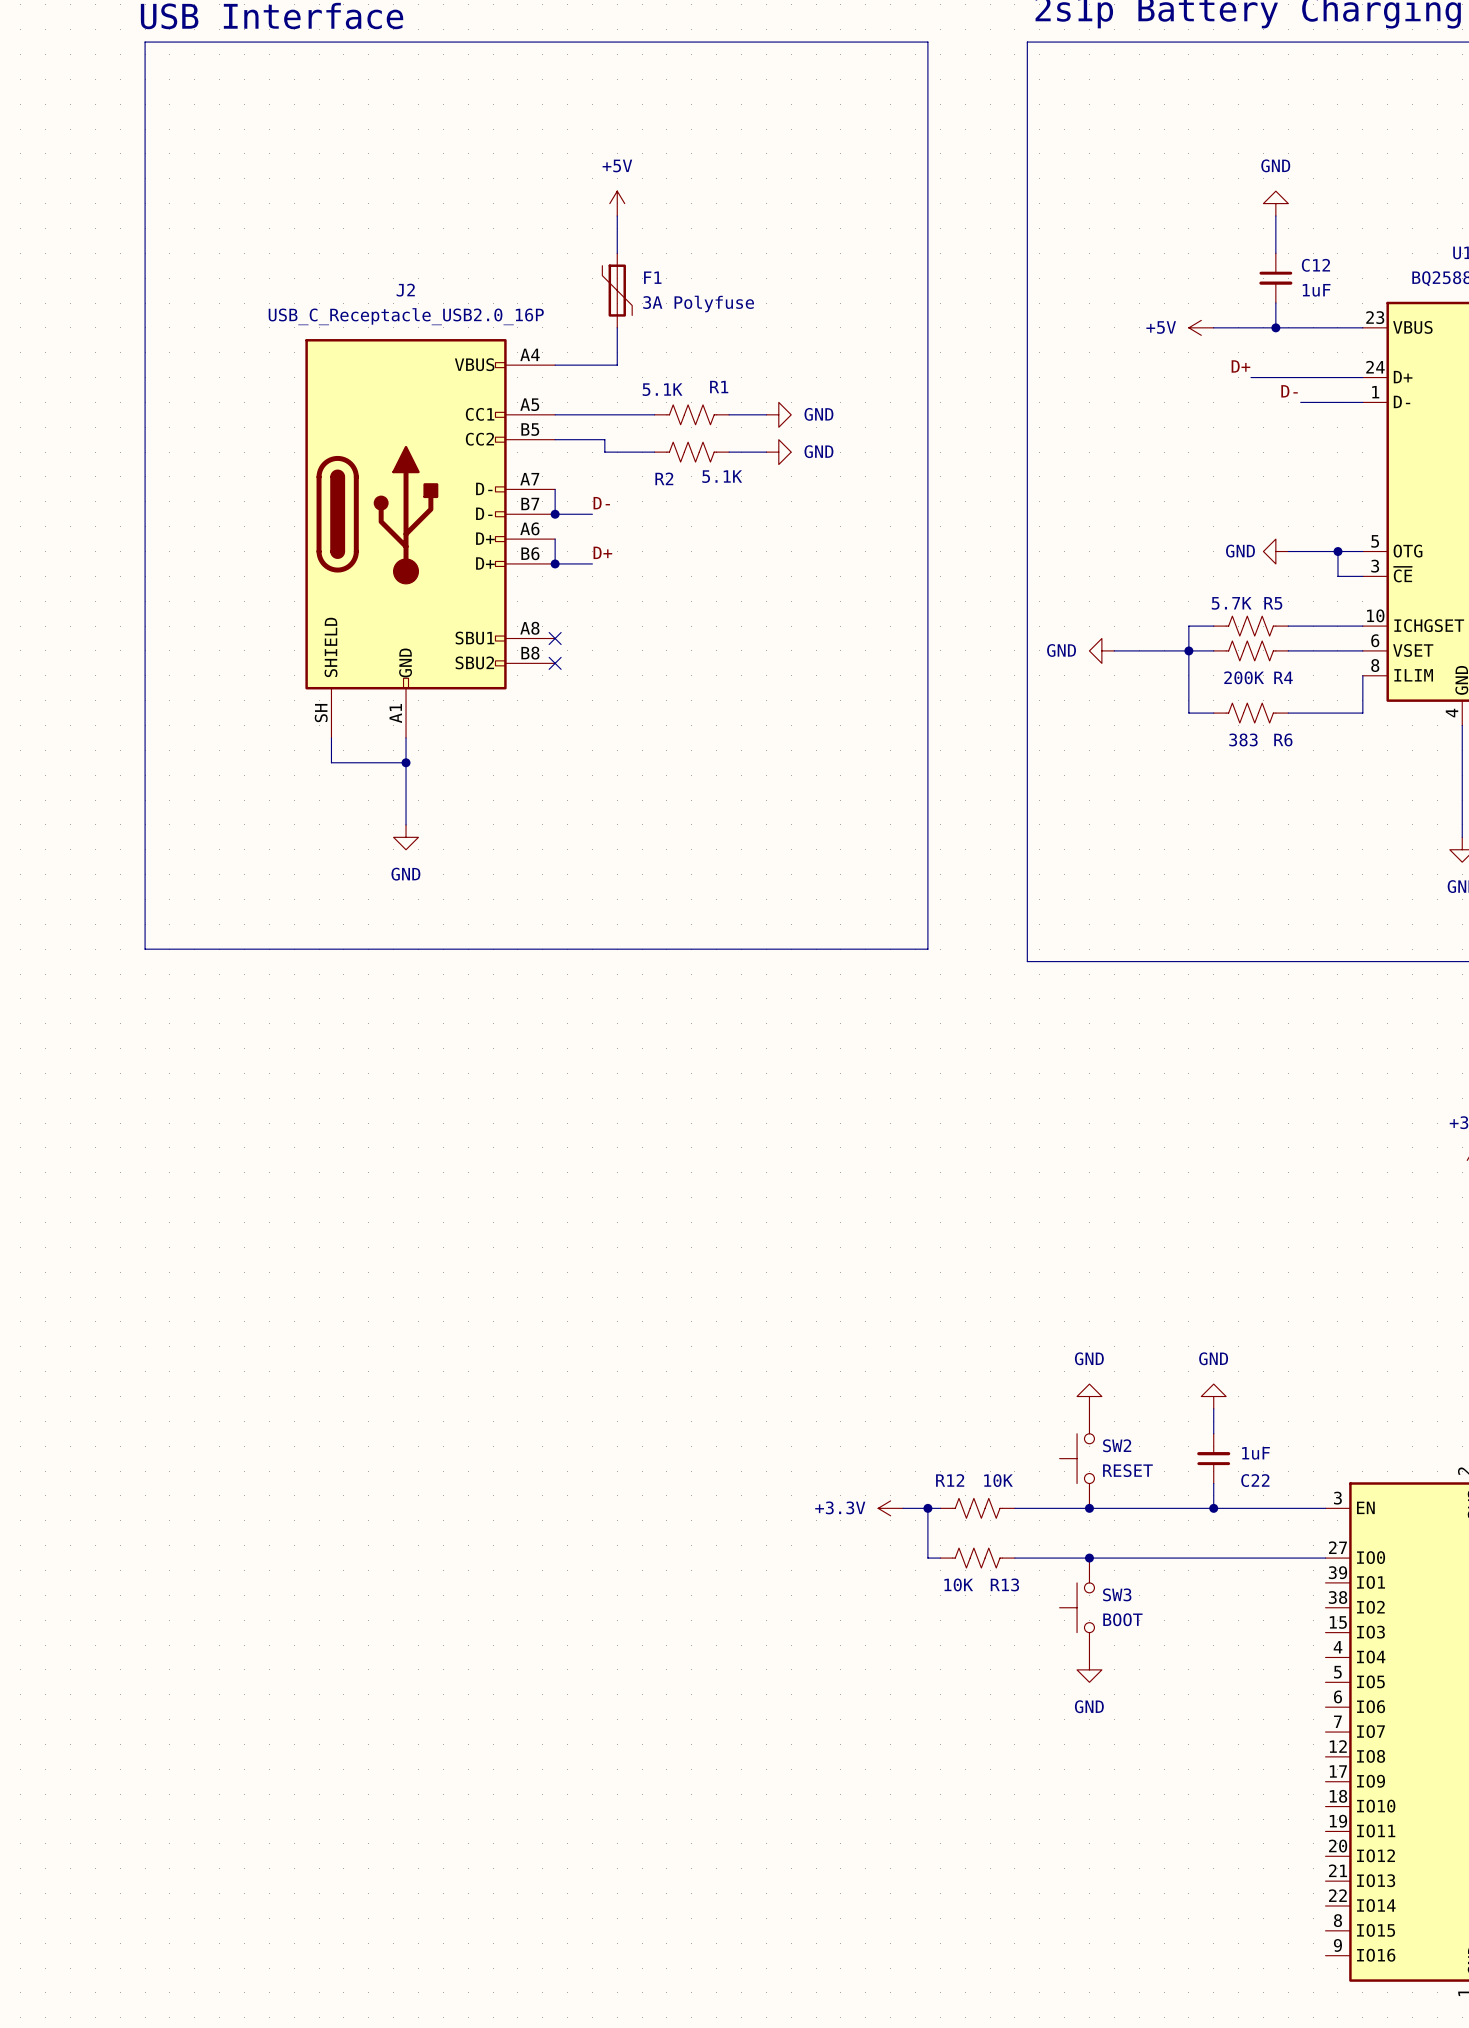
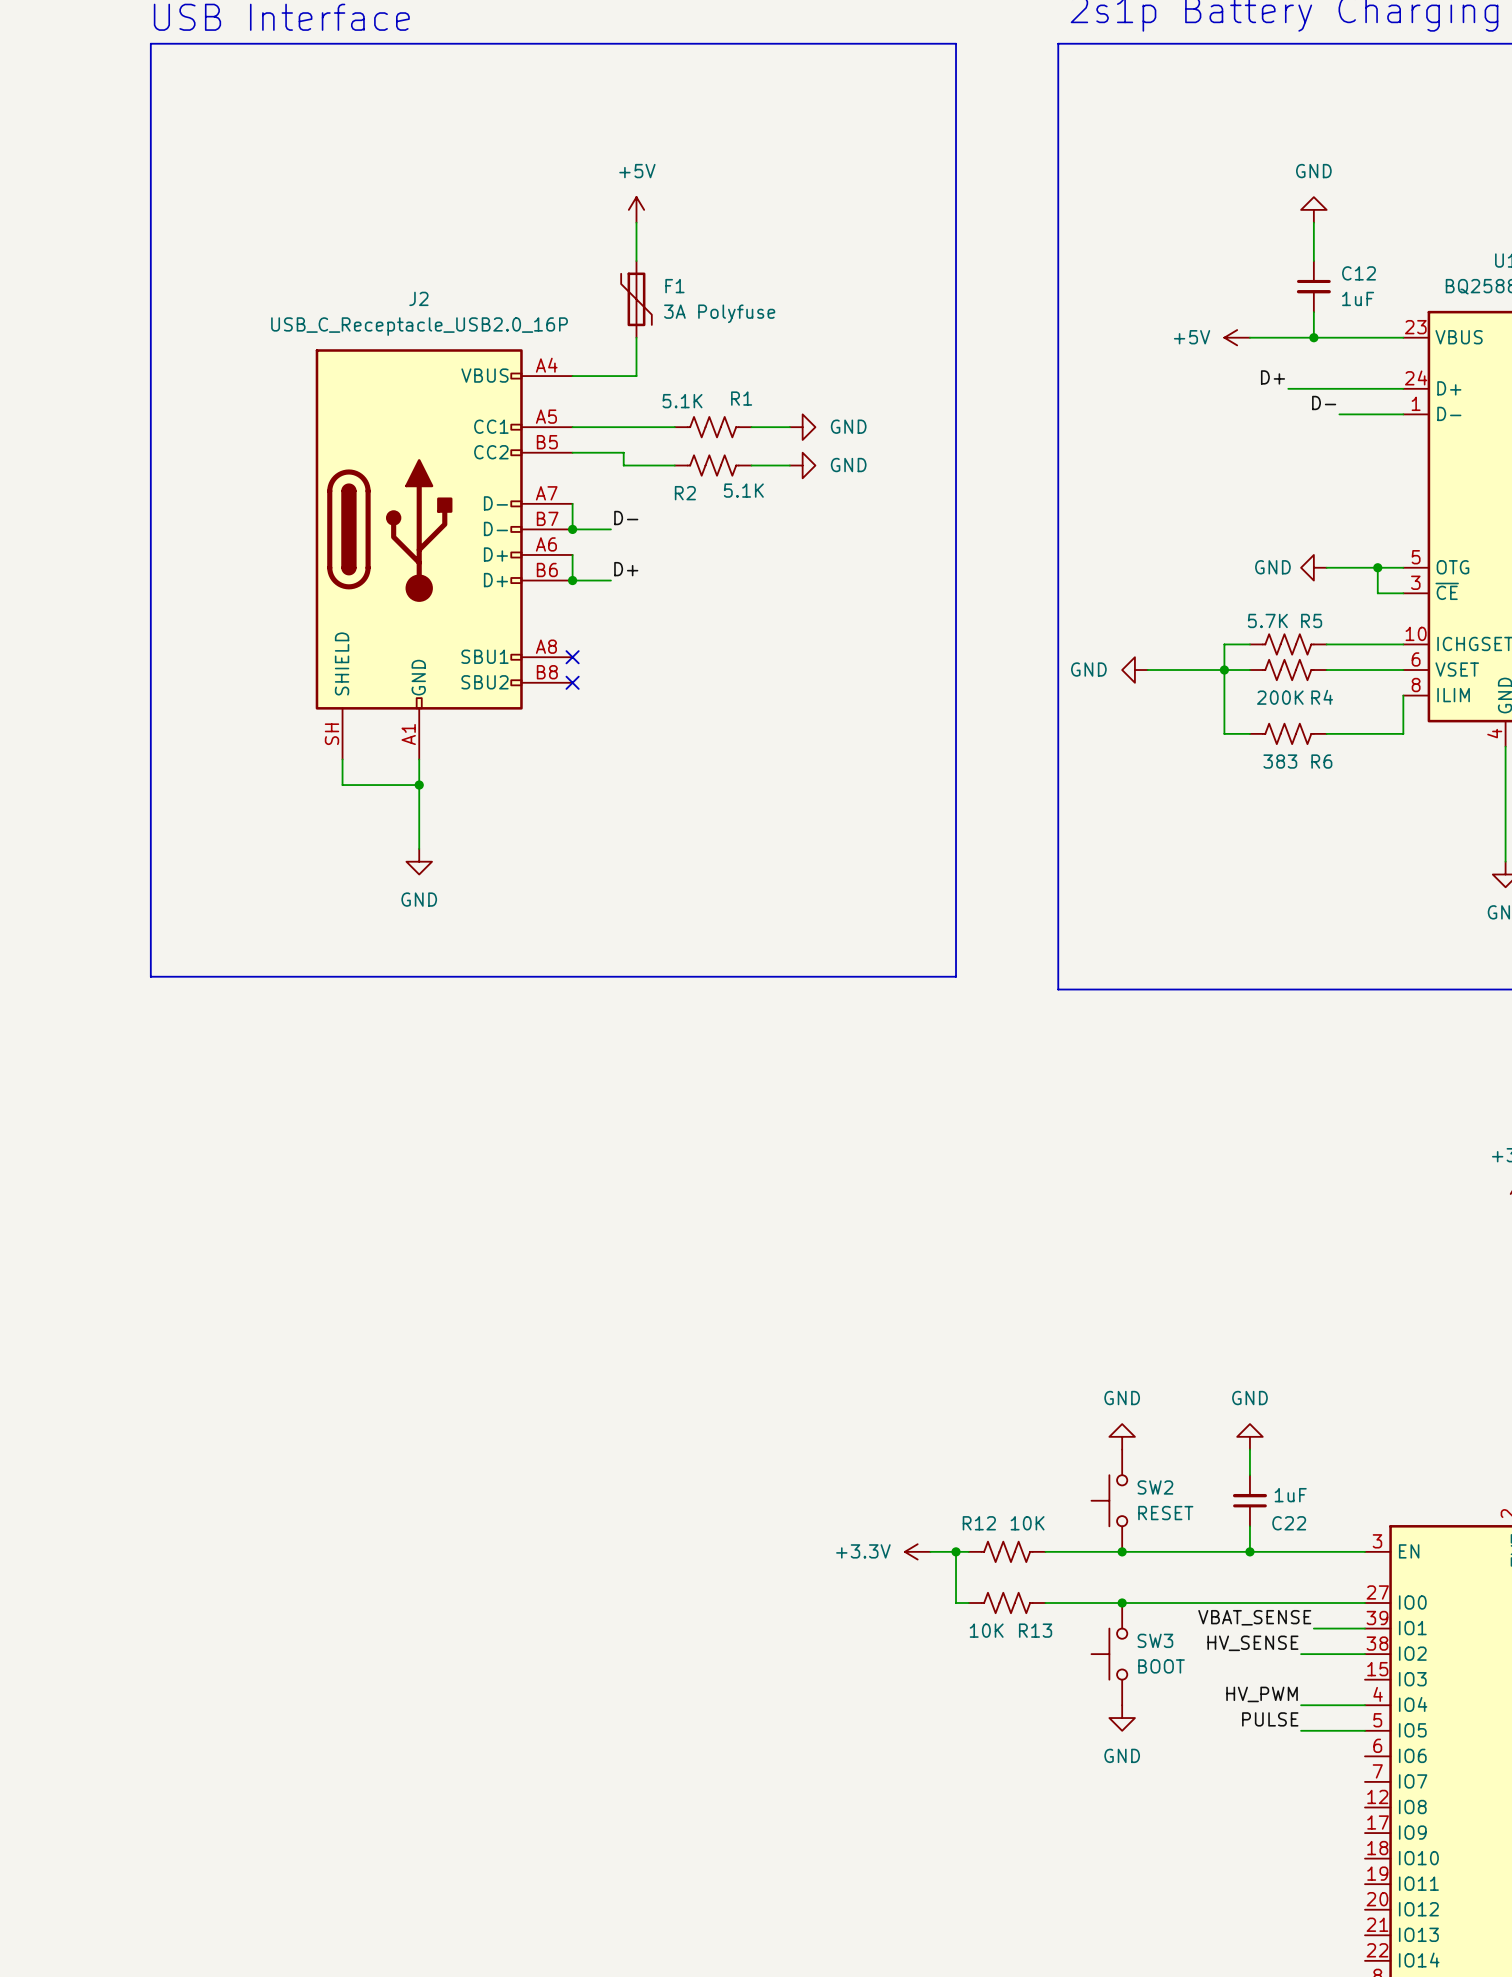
label: none -> VBAT_SENSE (1254, 1617)
wire: none -> (1313, 1628) (1365, 1628)
label: none -> HV_SENSE (1252, 1643)
wire: none -> (1301, 1654) (1365, 1654)
label: none -> HV_PWM (1262, 1694)
wire: none -> (1301, 1705) (1365, 1705)
label: none -> PULSE (1270, 1719)
wire: none -> (1301, 1730) (1365, 1730)

